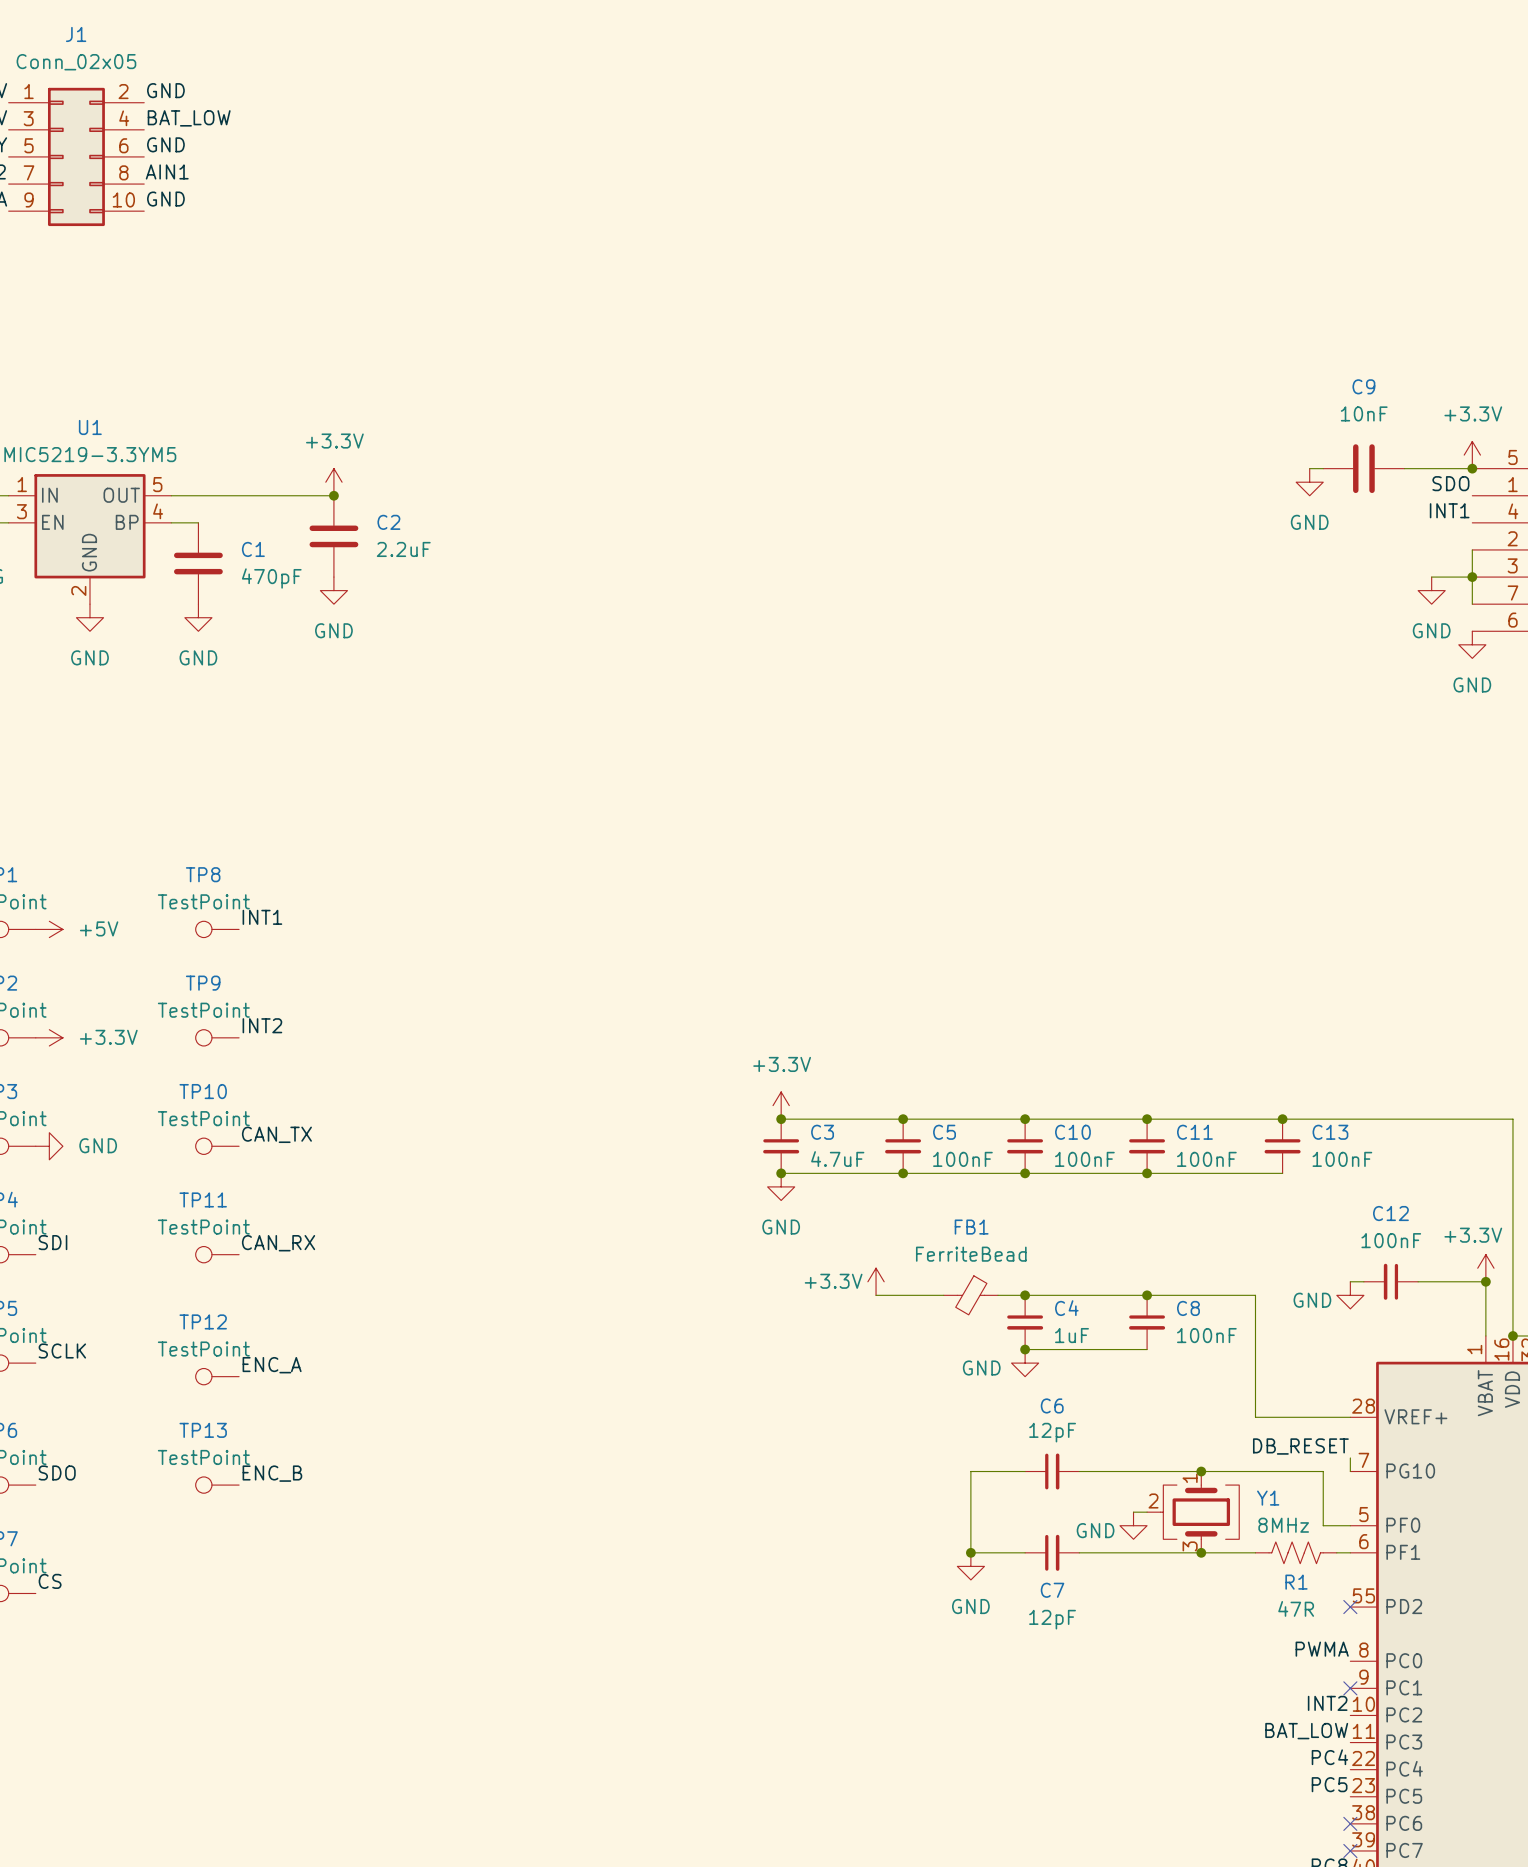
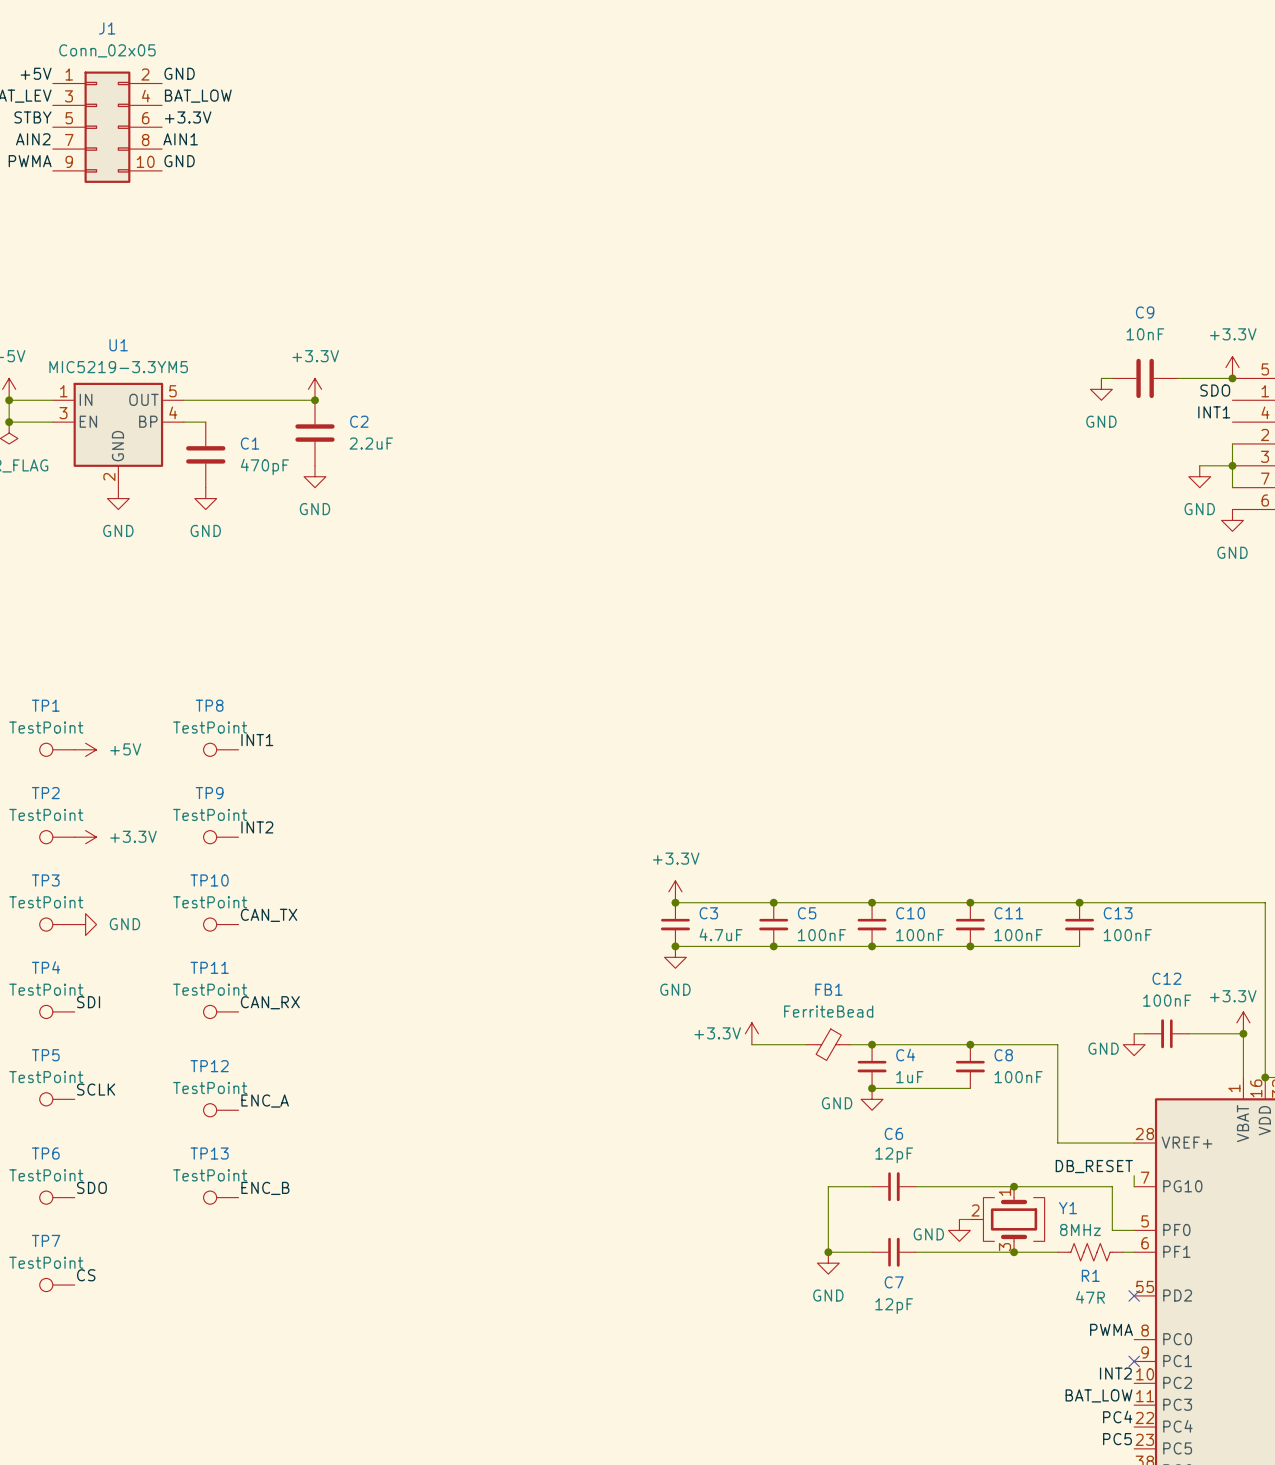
label: GND (165, 144) -> +3.3V (188, 117)

